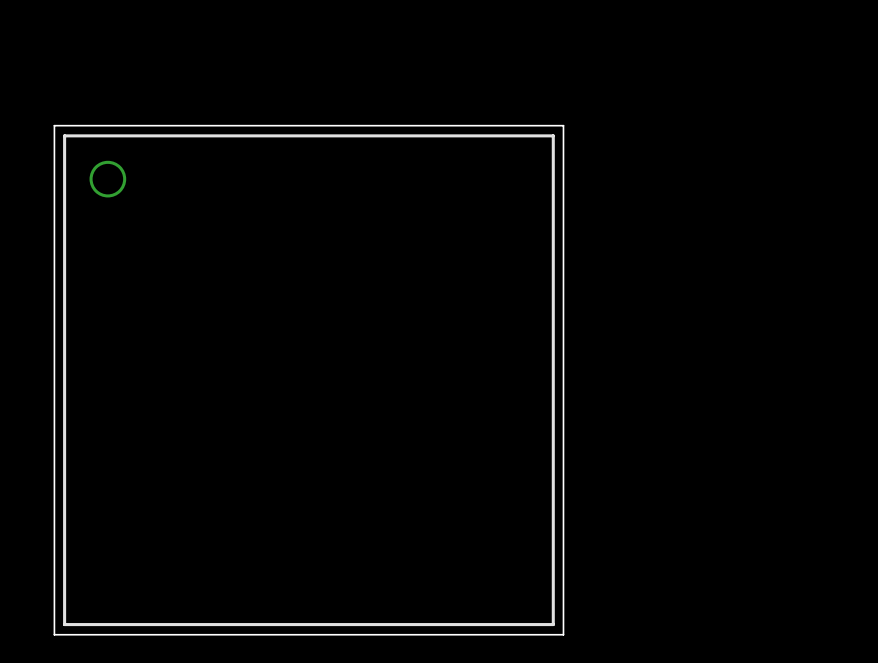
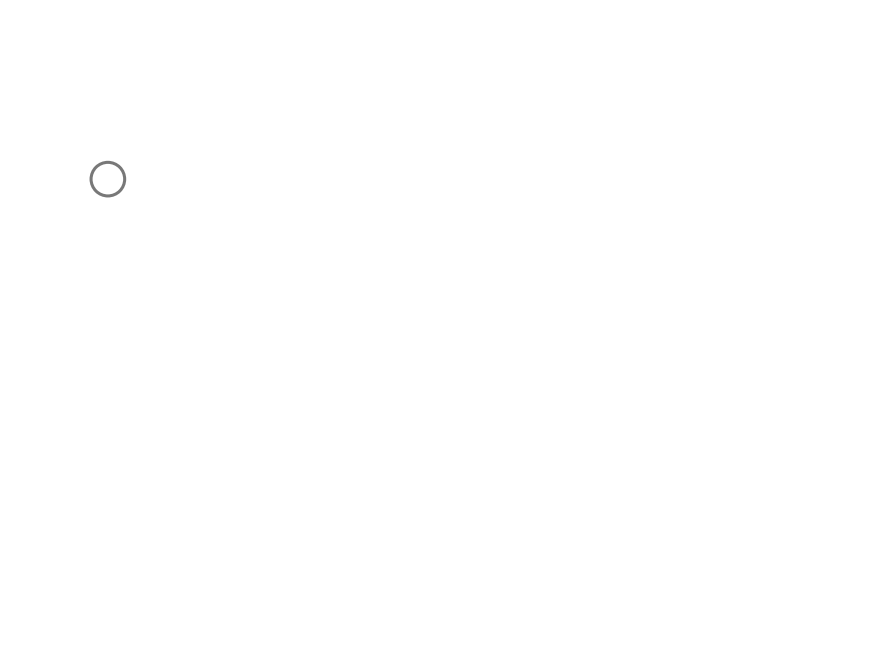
board edge: (54, 125) (563, 125) (563, 634) (54, 634) (54, 125) -> none
line: (64, 135) (553, 135) (553, 624) (64, 624) (64, 135) -> none

